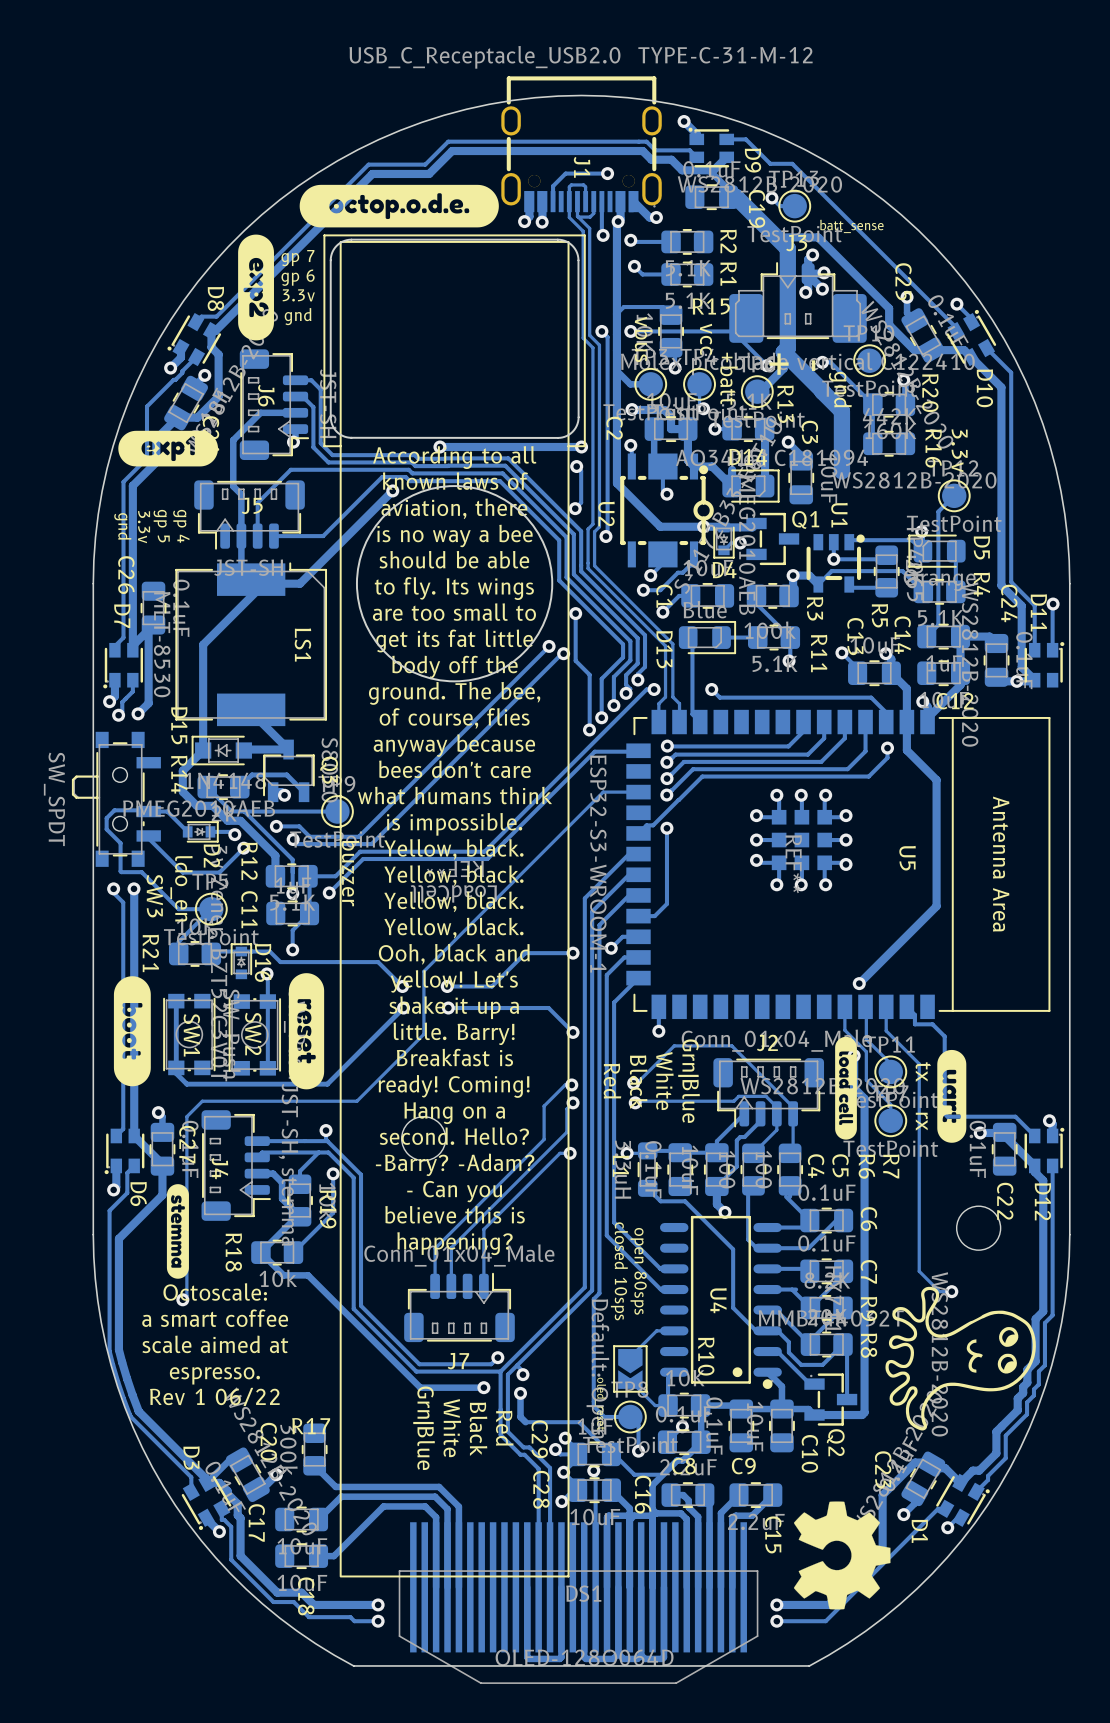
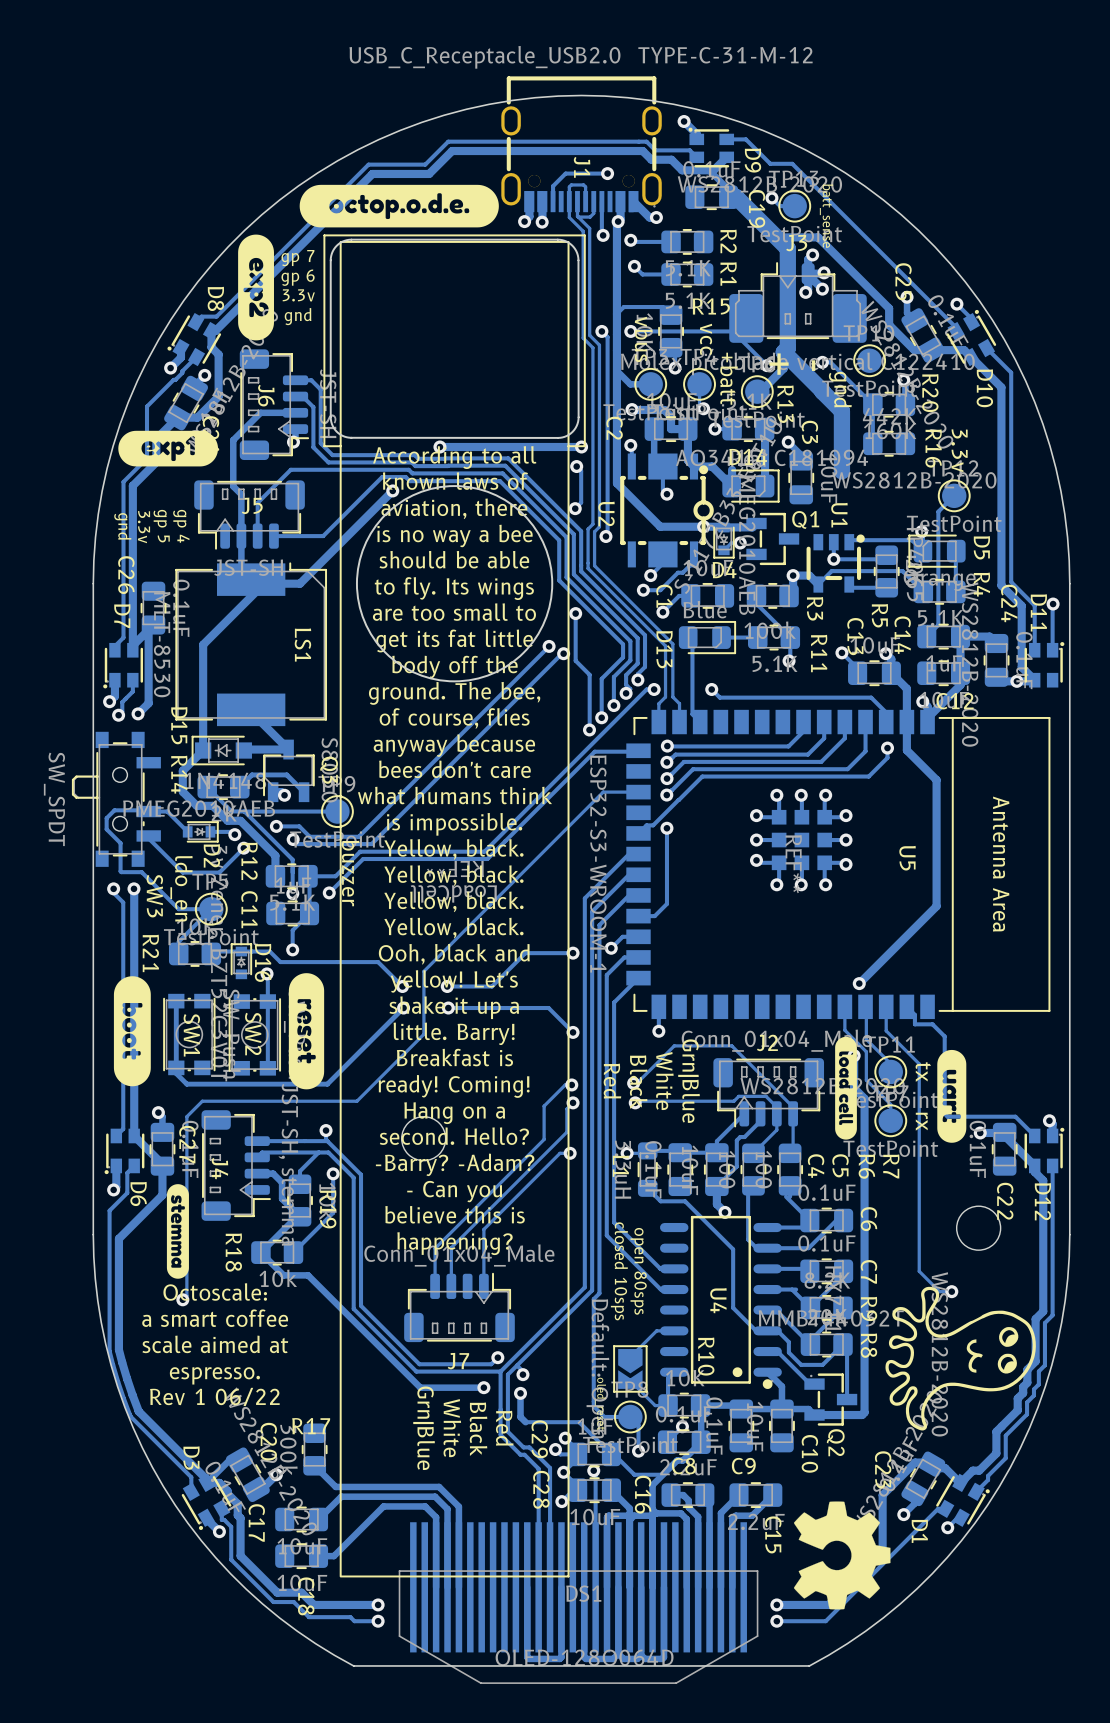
text rotation: 0° (851, 226) -> 90° clockwise (826, 216)

